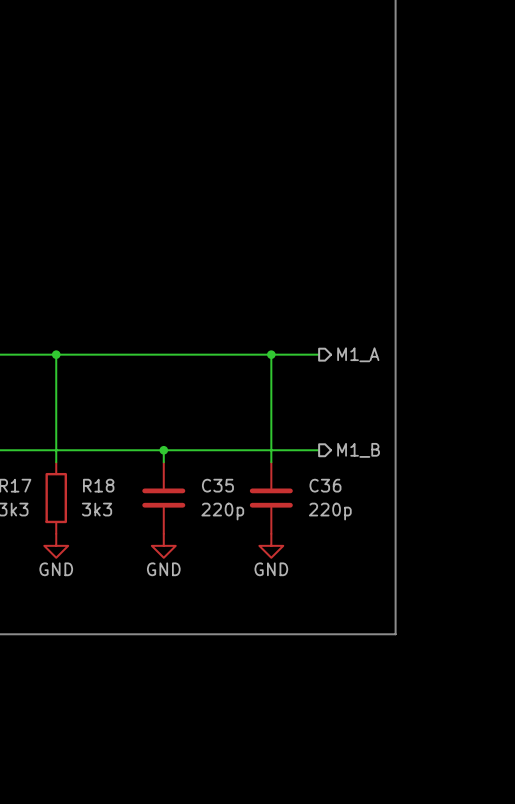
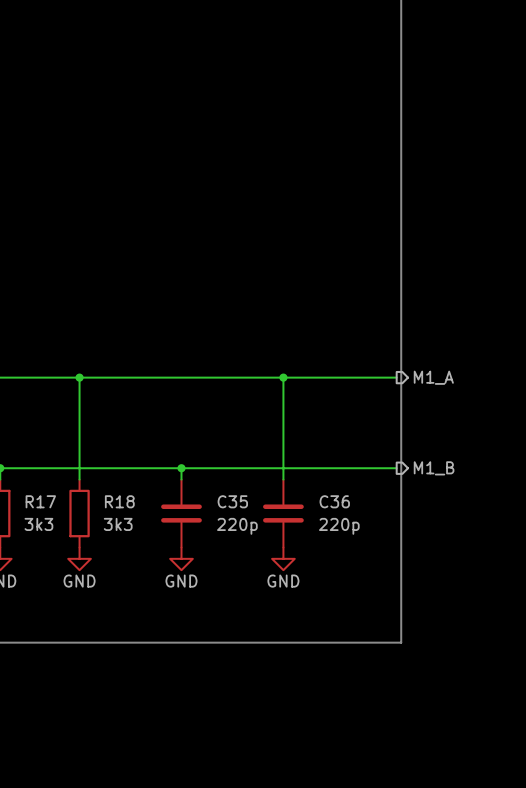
wire: none -> (328, 377) (396, 377)
hierarchical label position: M1_A (358, 354) -> M1_A (433, 377)
wire: none -> (328, 468) (396, 468)
hierarchical label position: M1_B (358, 450) -> M1_B (434, 468)

